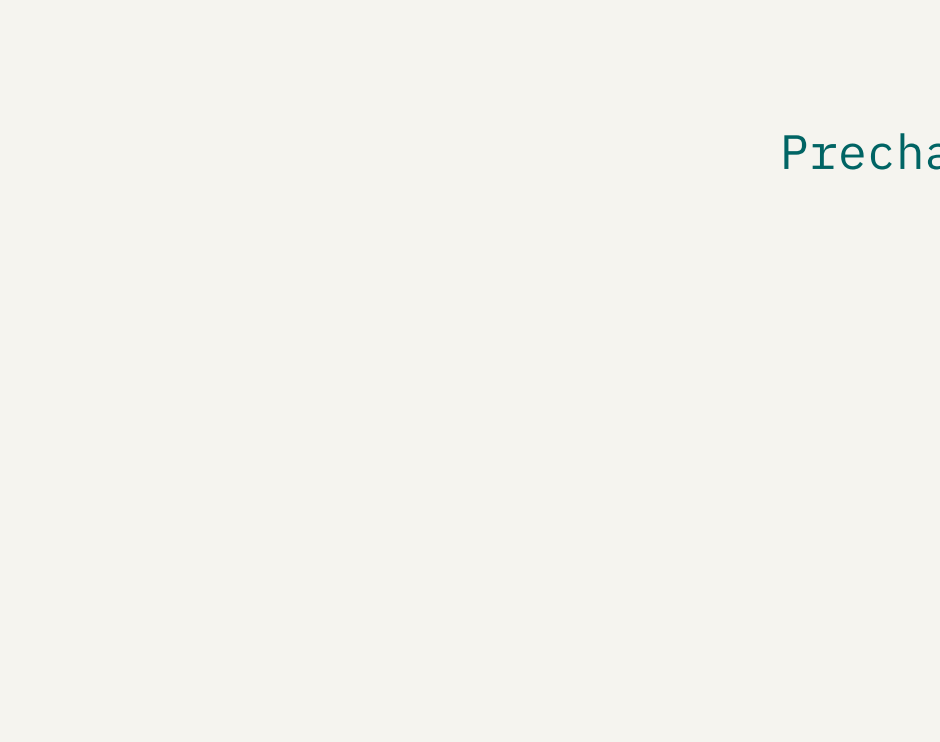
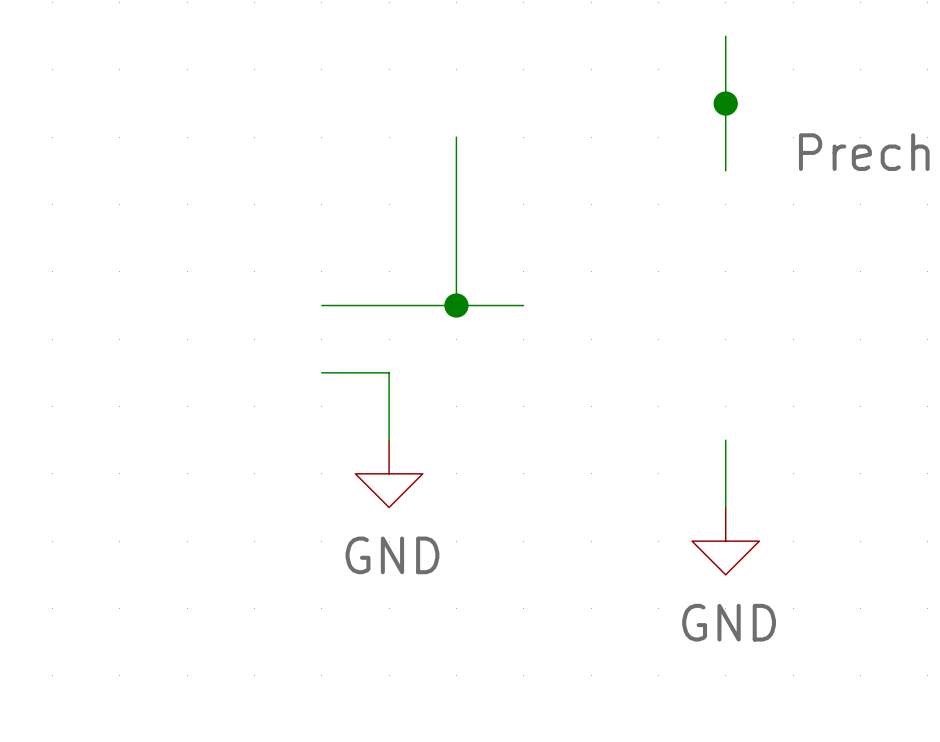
wire: none -> (725, 36) (725, 170)
junction: none -> (725, 103)
wire: none -> (456, 137) (456, 305)
wire: none -> (321, 305) (523, 305)
junction: none -> (456, 305)
wire: none -> (321, 372) (389, 372) (389, 440)
wire: none -> (725, 440) (725, 507)
power symbol: none -> GND (389, 473)
power symbol: none -> GND (725, 541)

